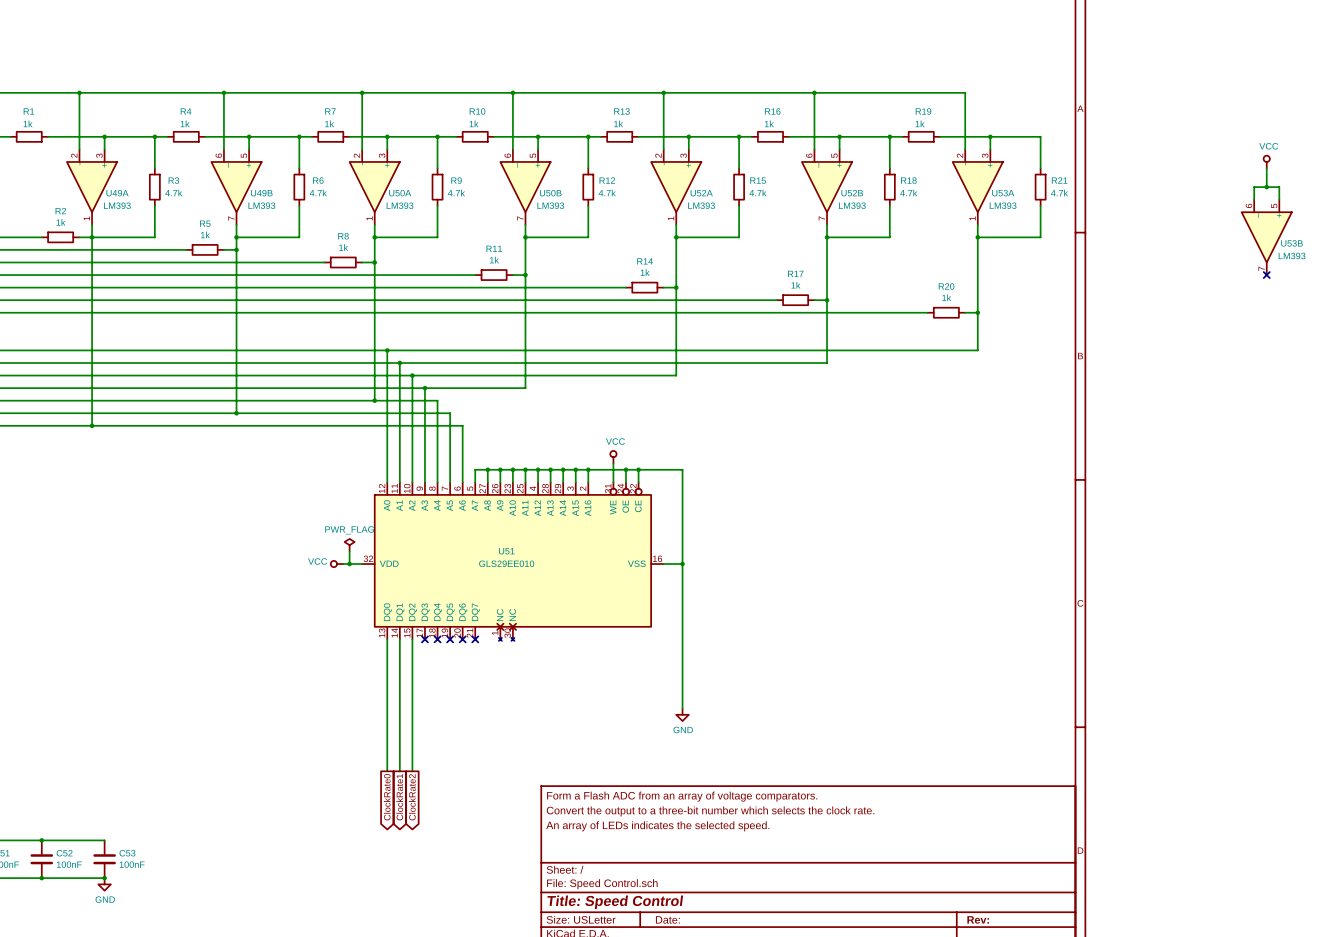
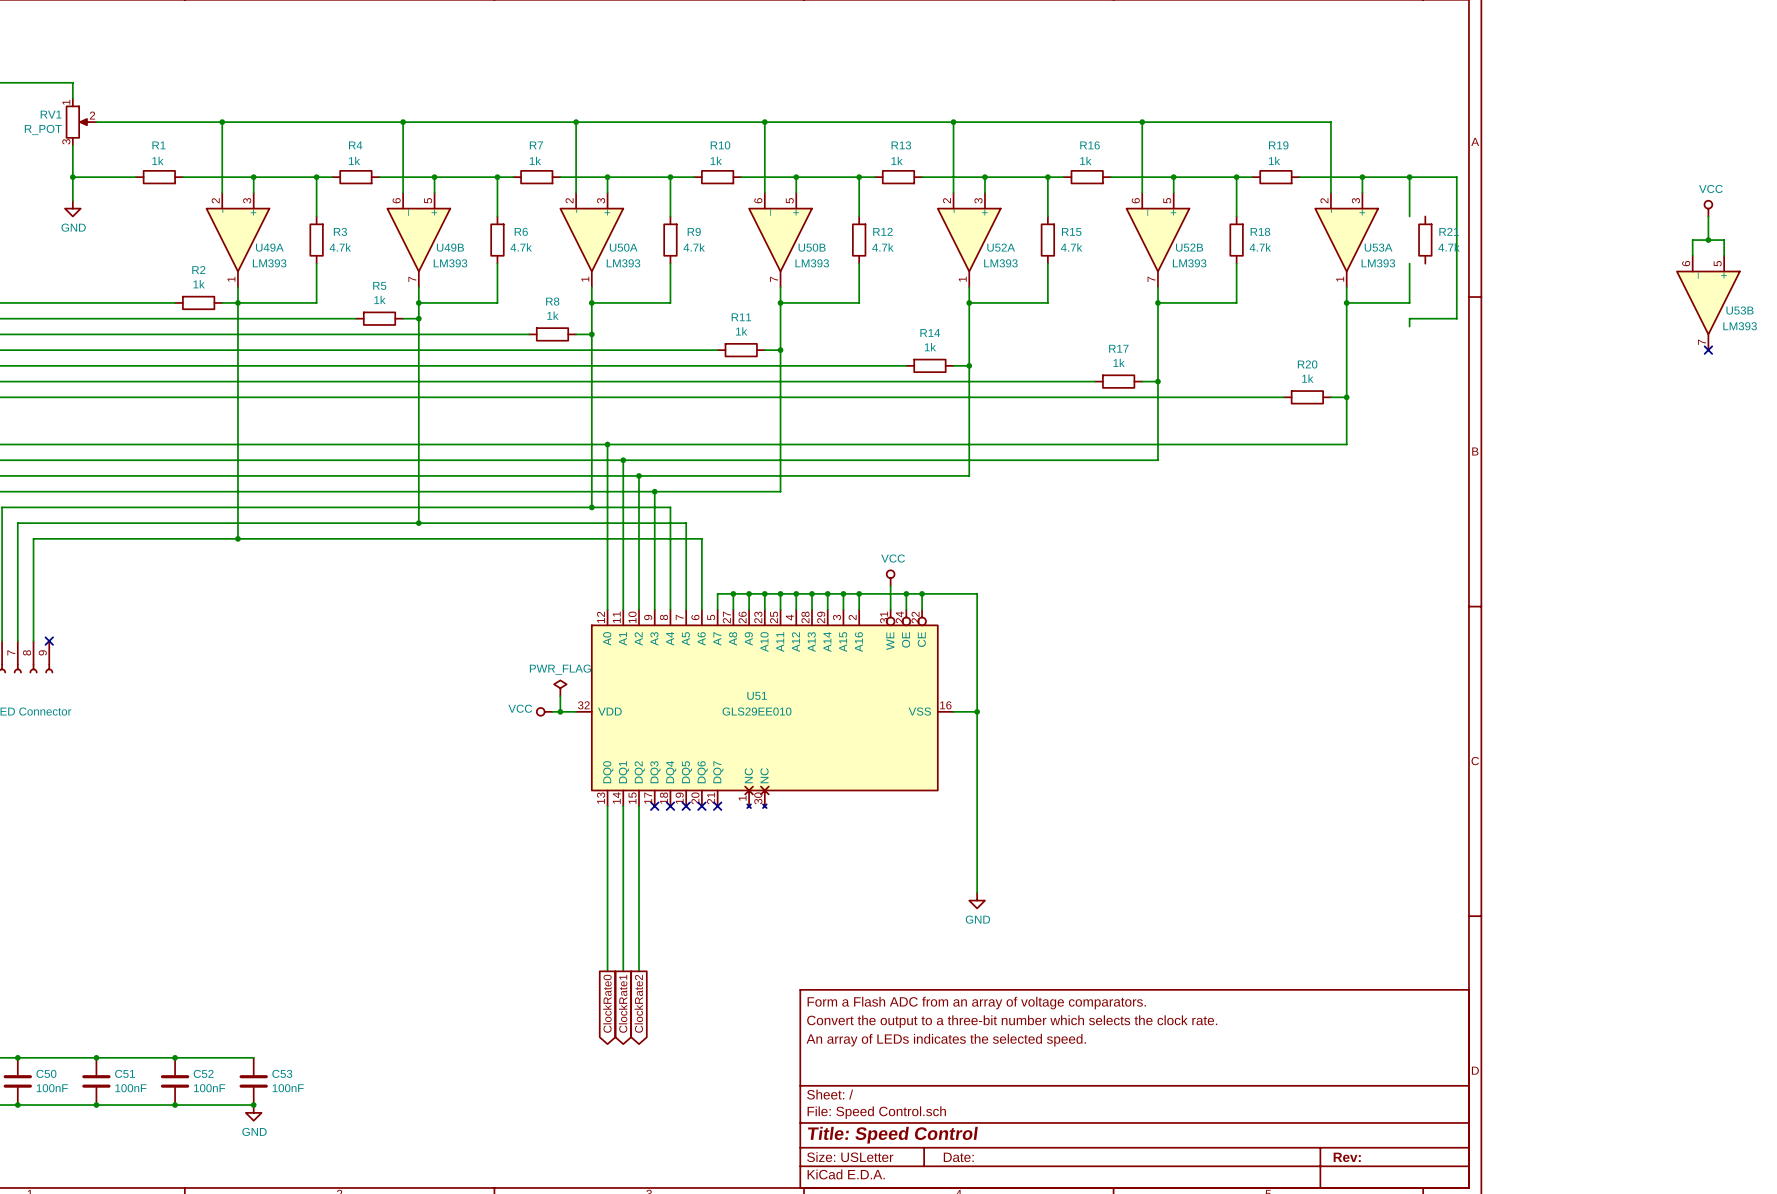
wire: none -> (1409, 177) (1409, 216)
junction: none -> (1409, 177)
wire: (1040, 136) (1040, 168) -> (1425, 177) (1456, 177) (1456, 318) (1409, 318) (1409, 326)
wire: (1040, 205) (1040, 237) (1028, 237) -> (1409, 263) (1409, 302)

